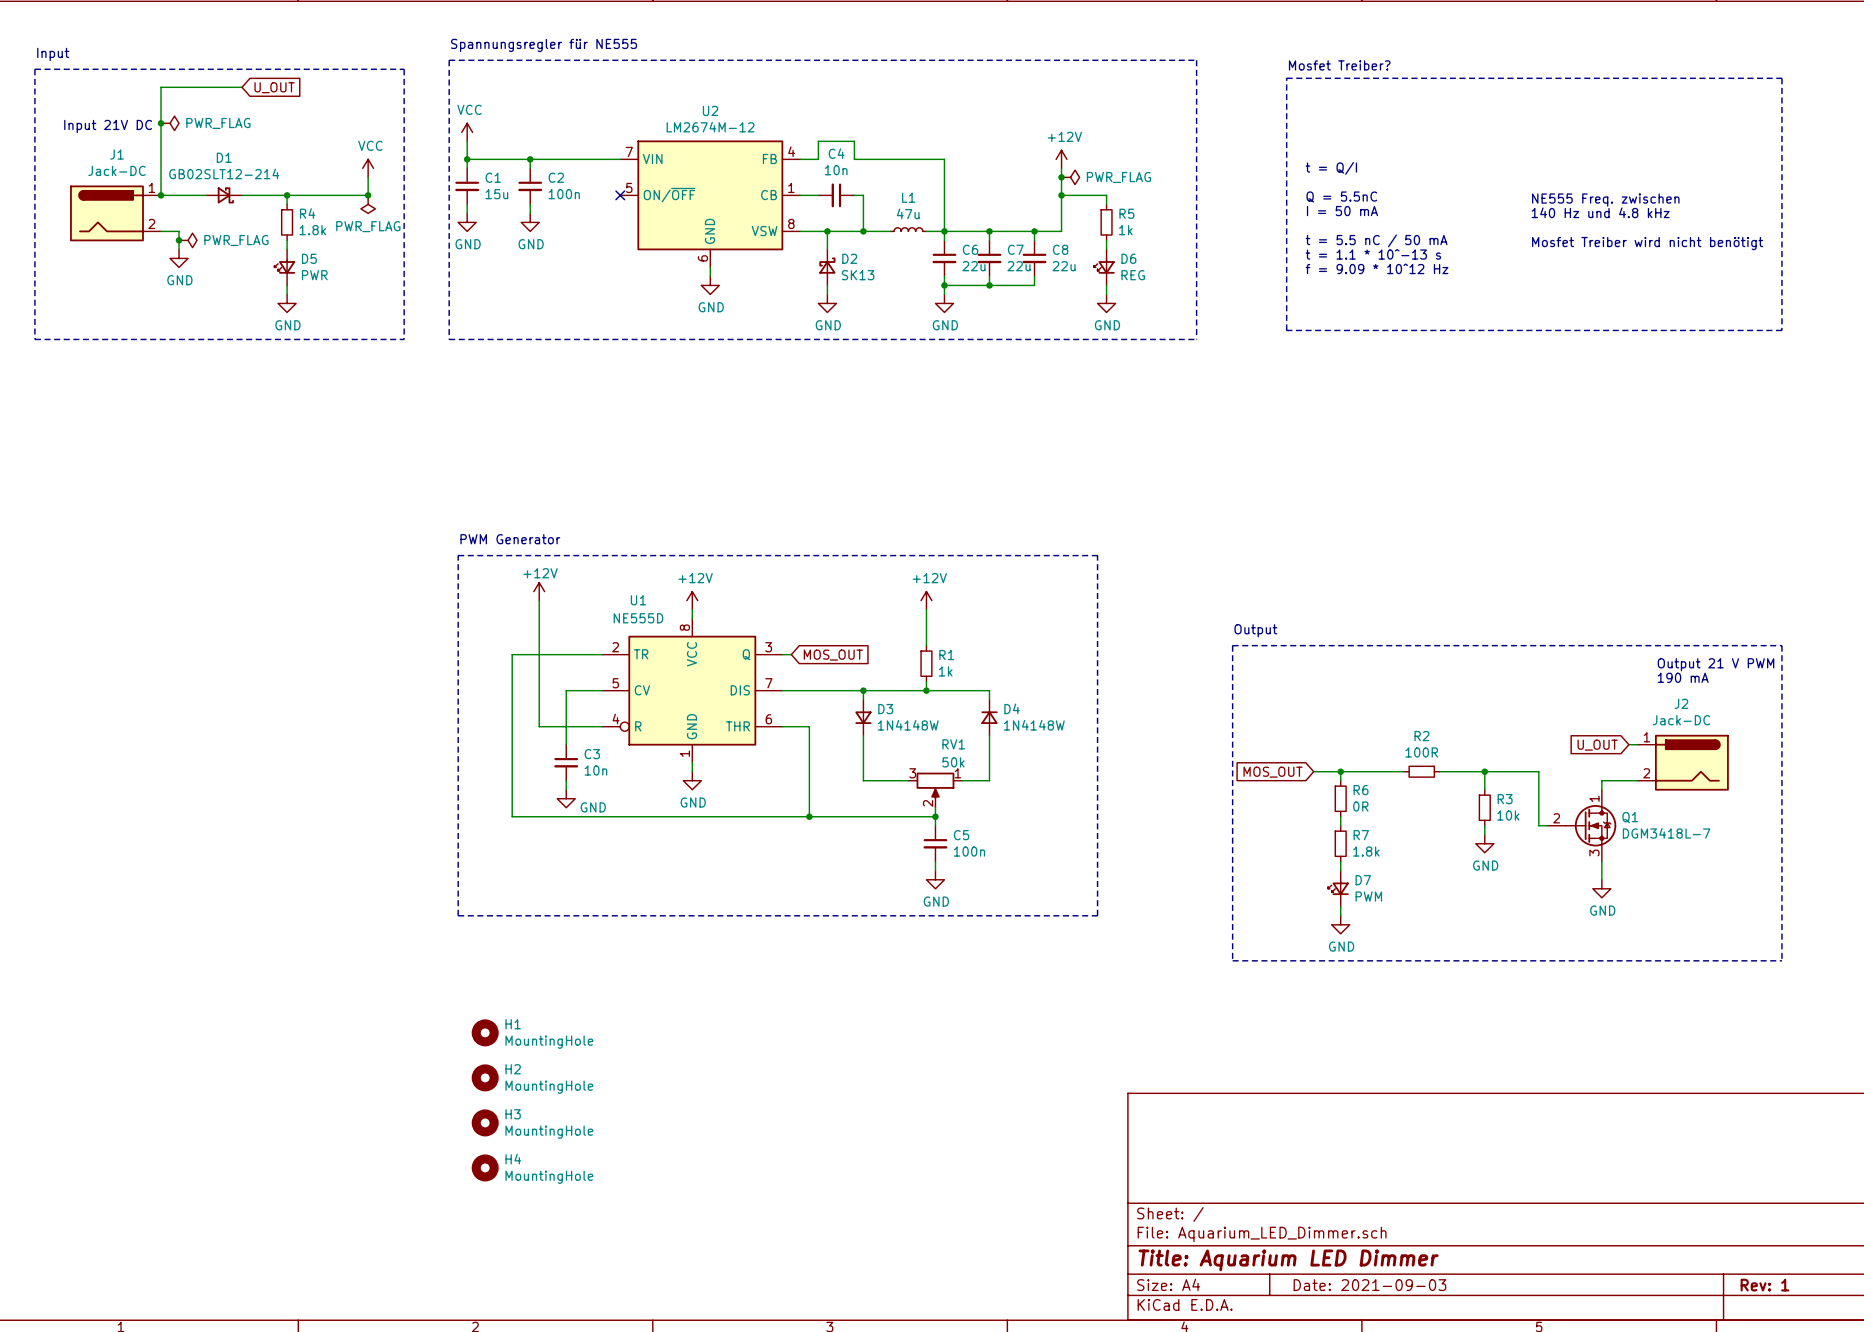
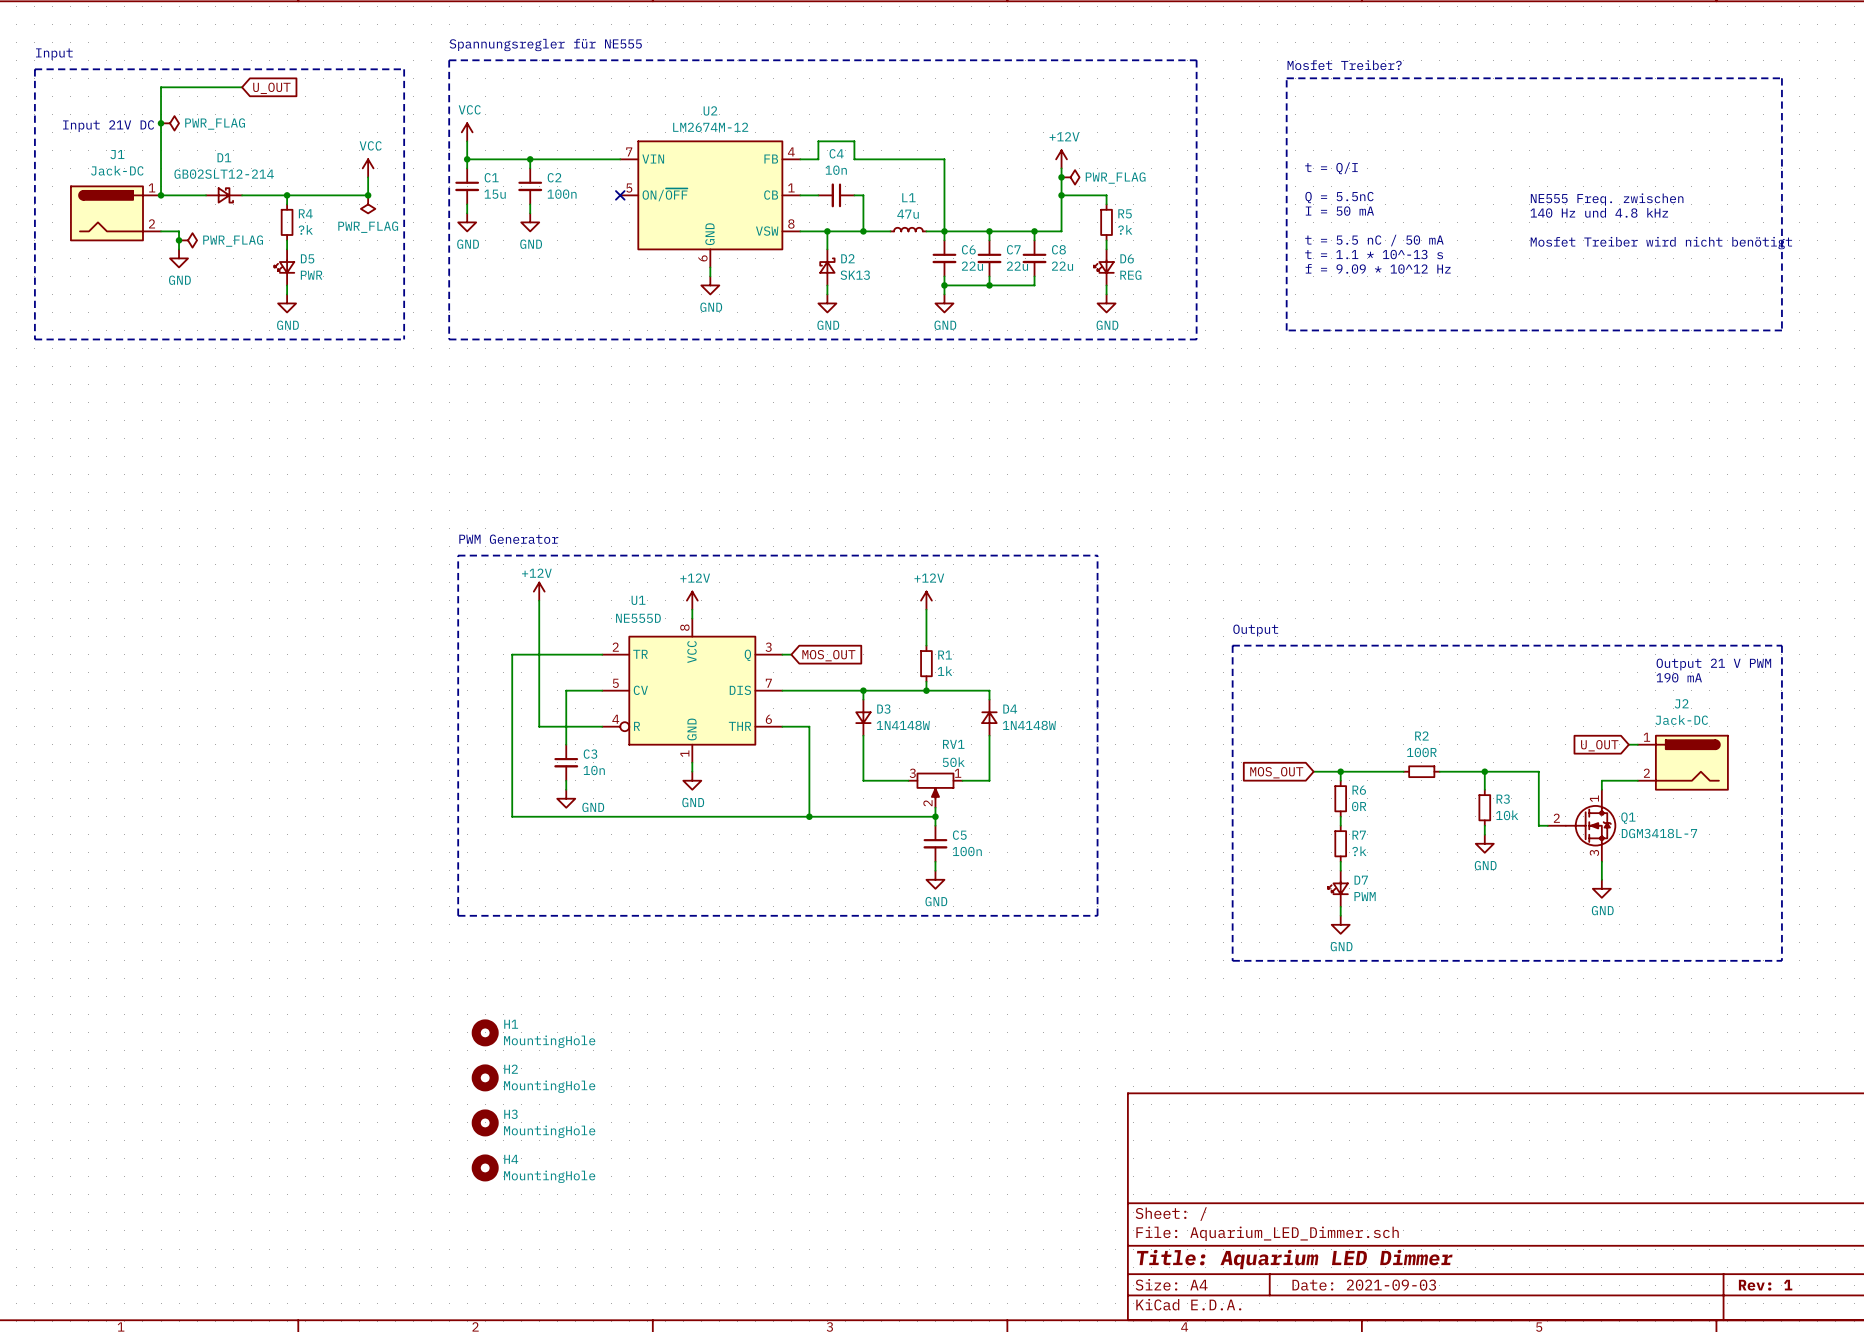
R4 value: 1.8k (312, 230) -> ?k (305, 229)
R5 value: 1k (1125, 230) -> ?k (1125, 229)
R7 value: 1.8k (1366, 851) -> ?k (1359, 851)

